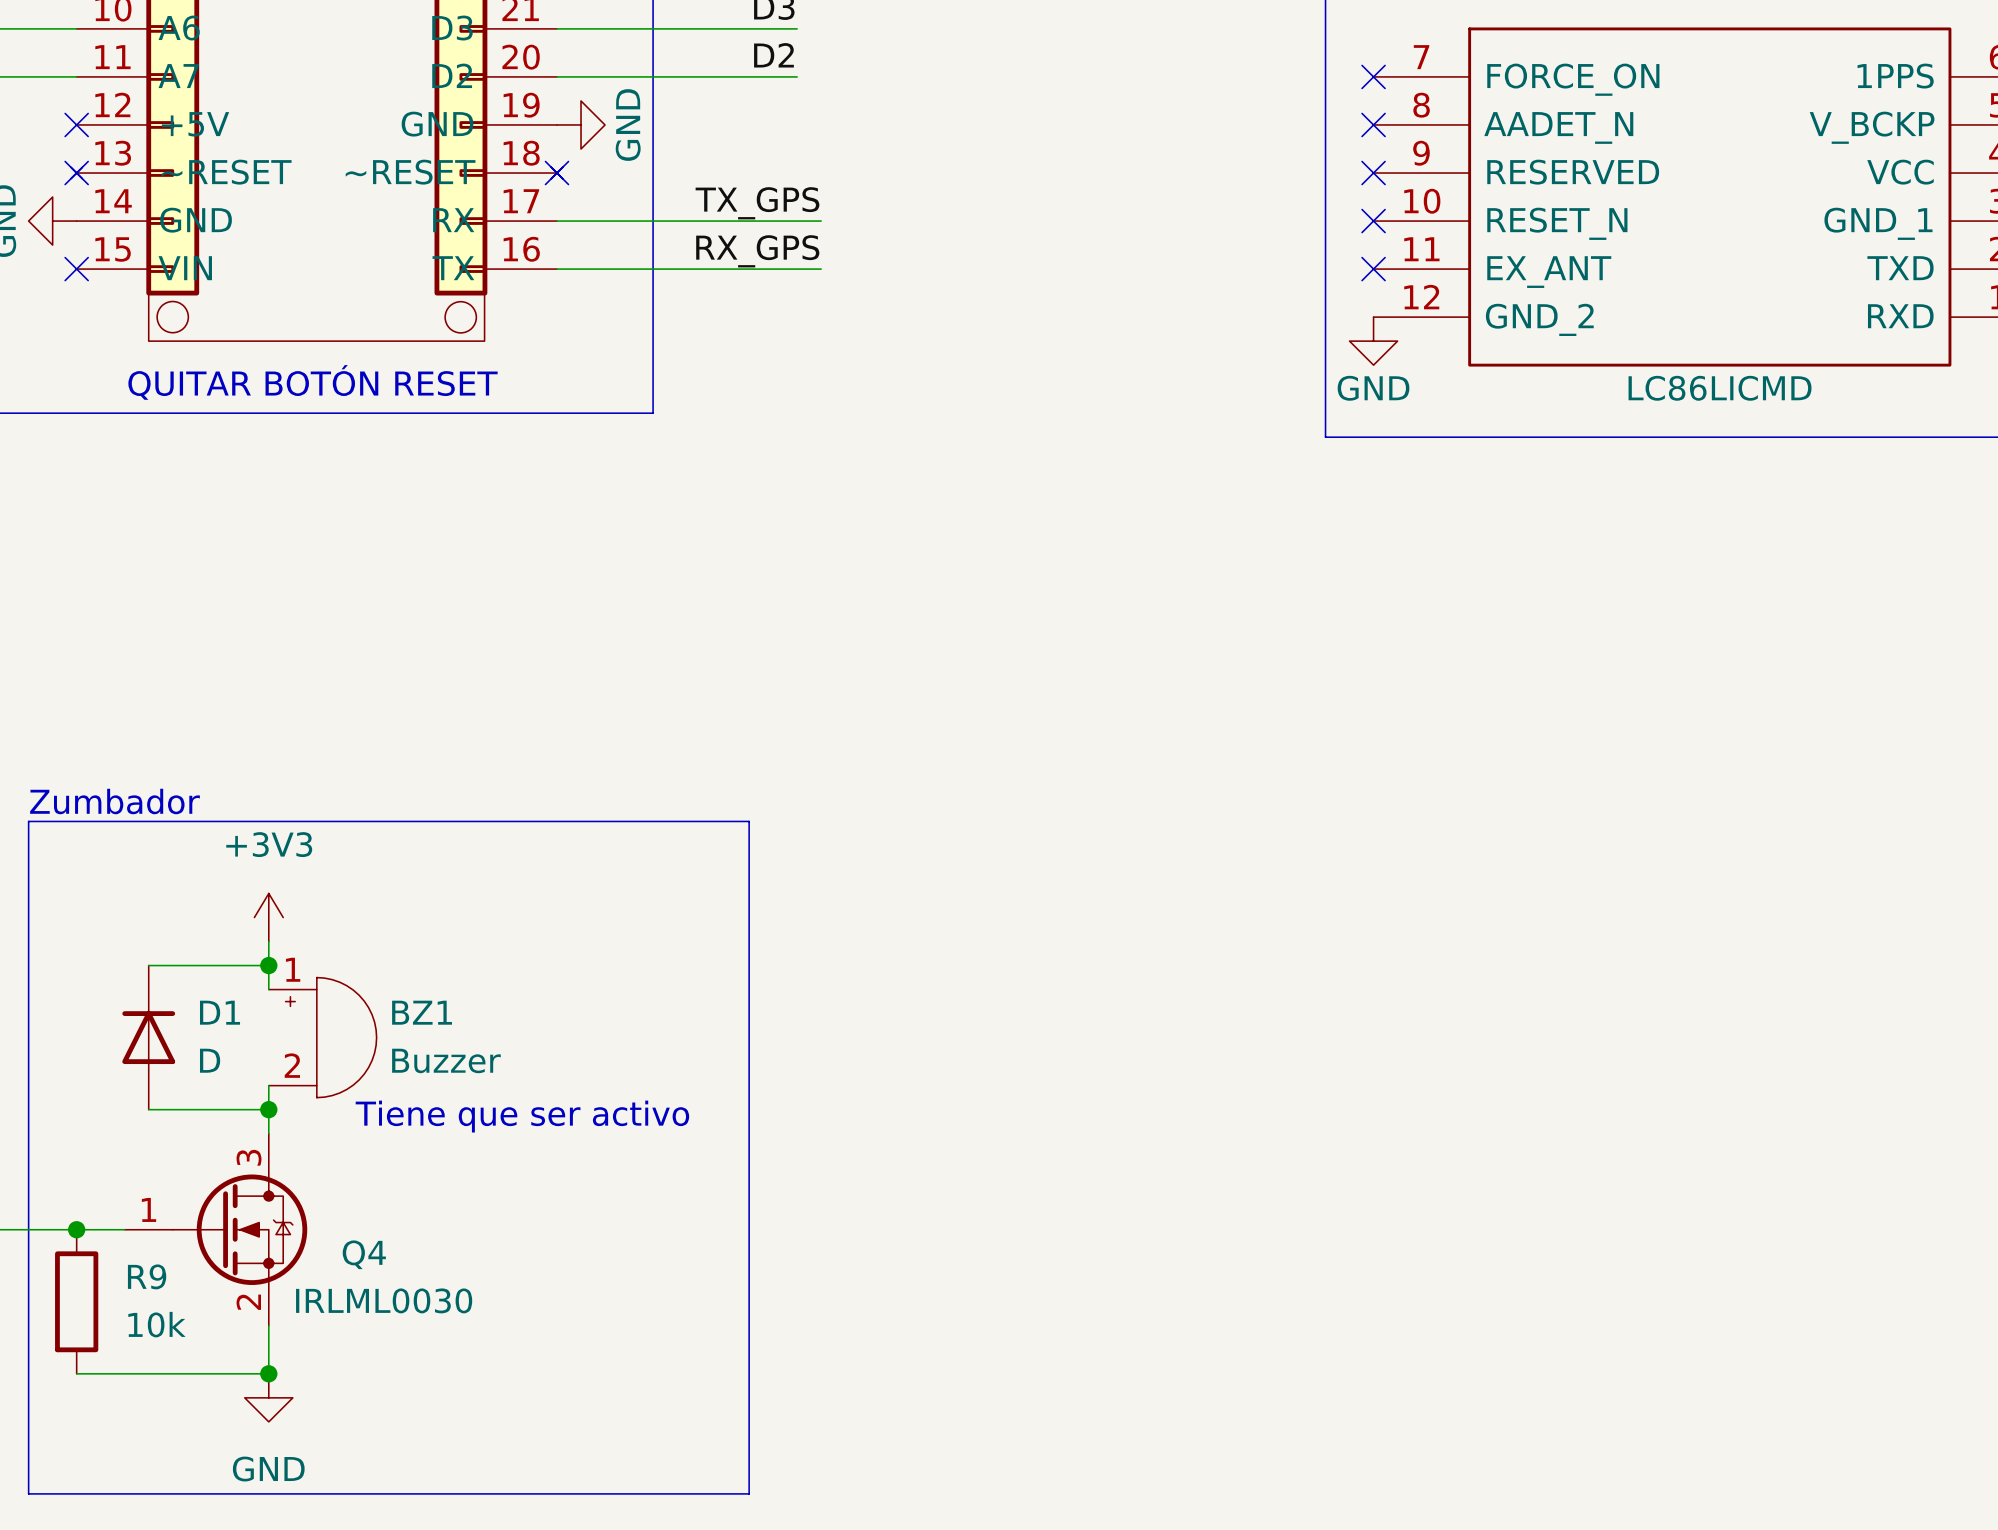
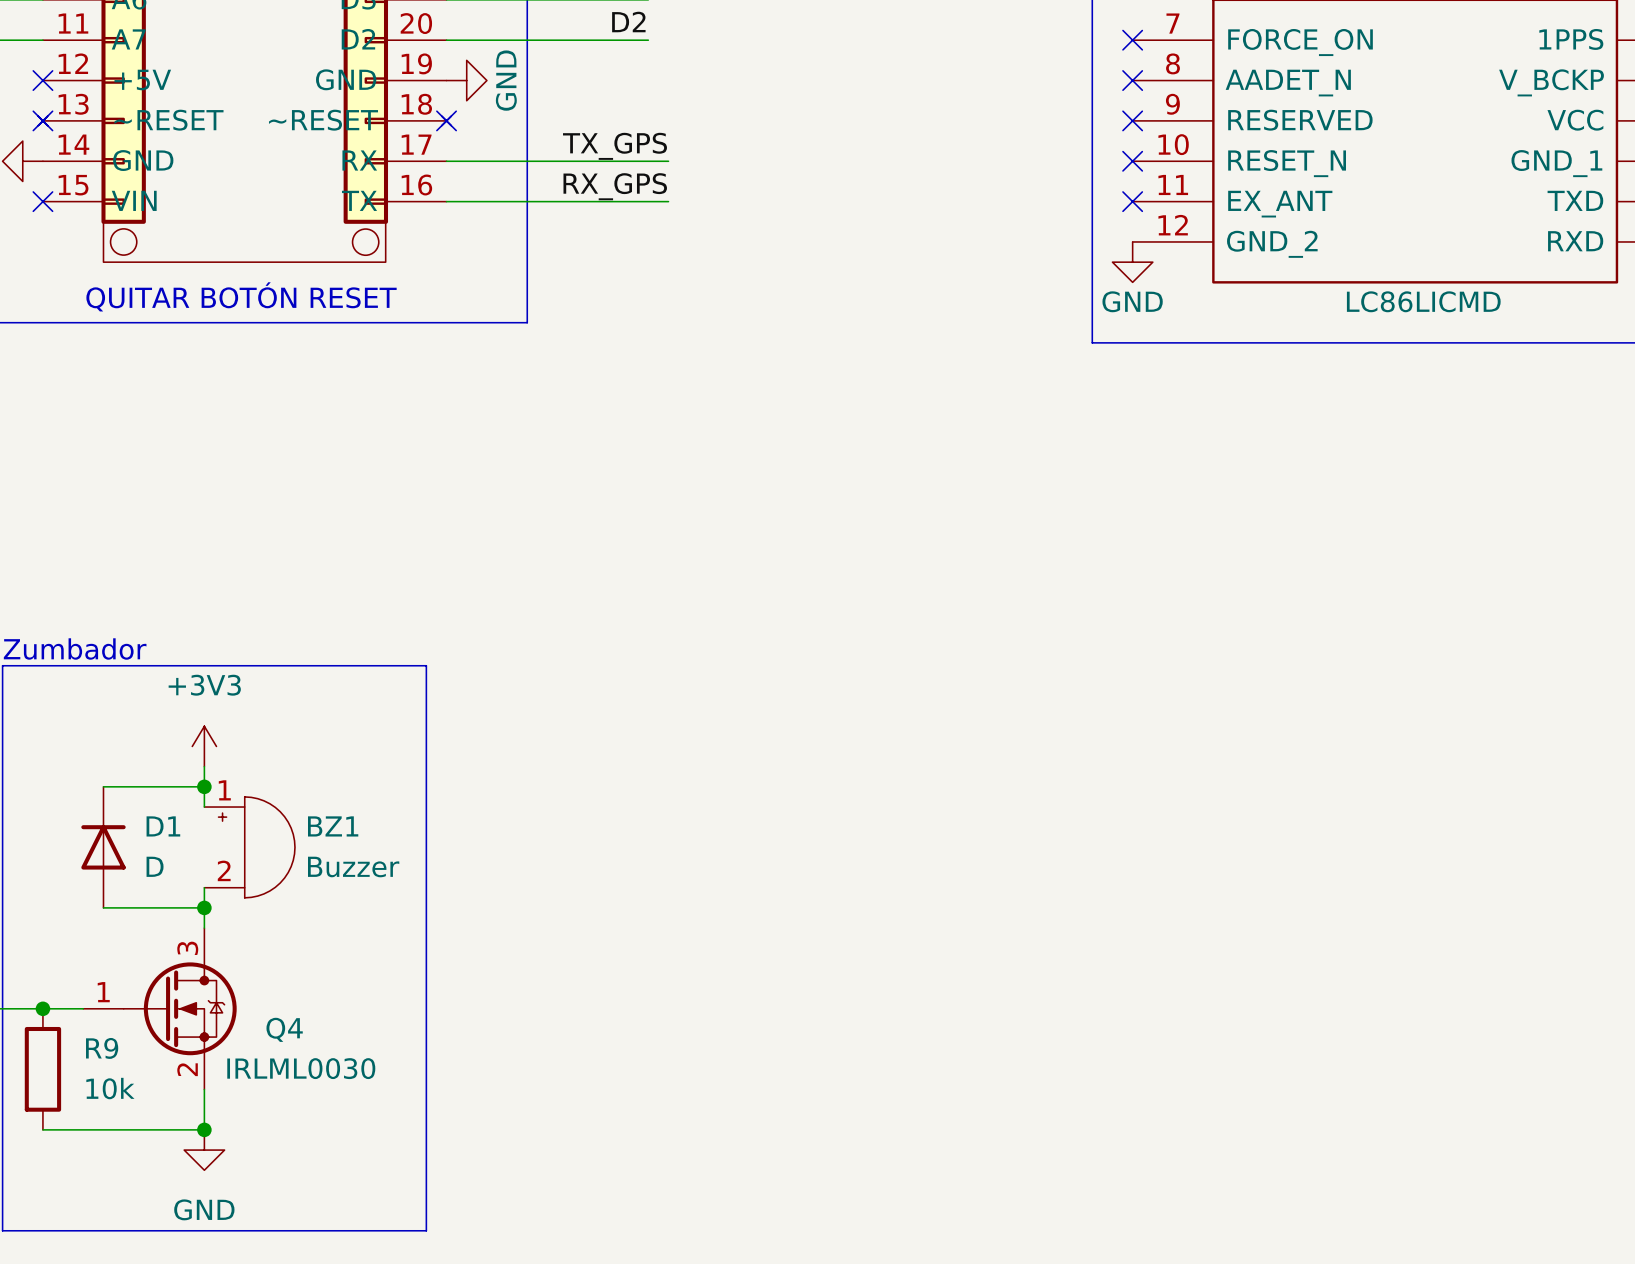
line: (532, 821) (749, 821) (749, 1493) (532, 1493) -> (426, 665) (426, 1230)
text: Tiene que ser activo (522, 1116) -> none

